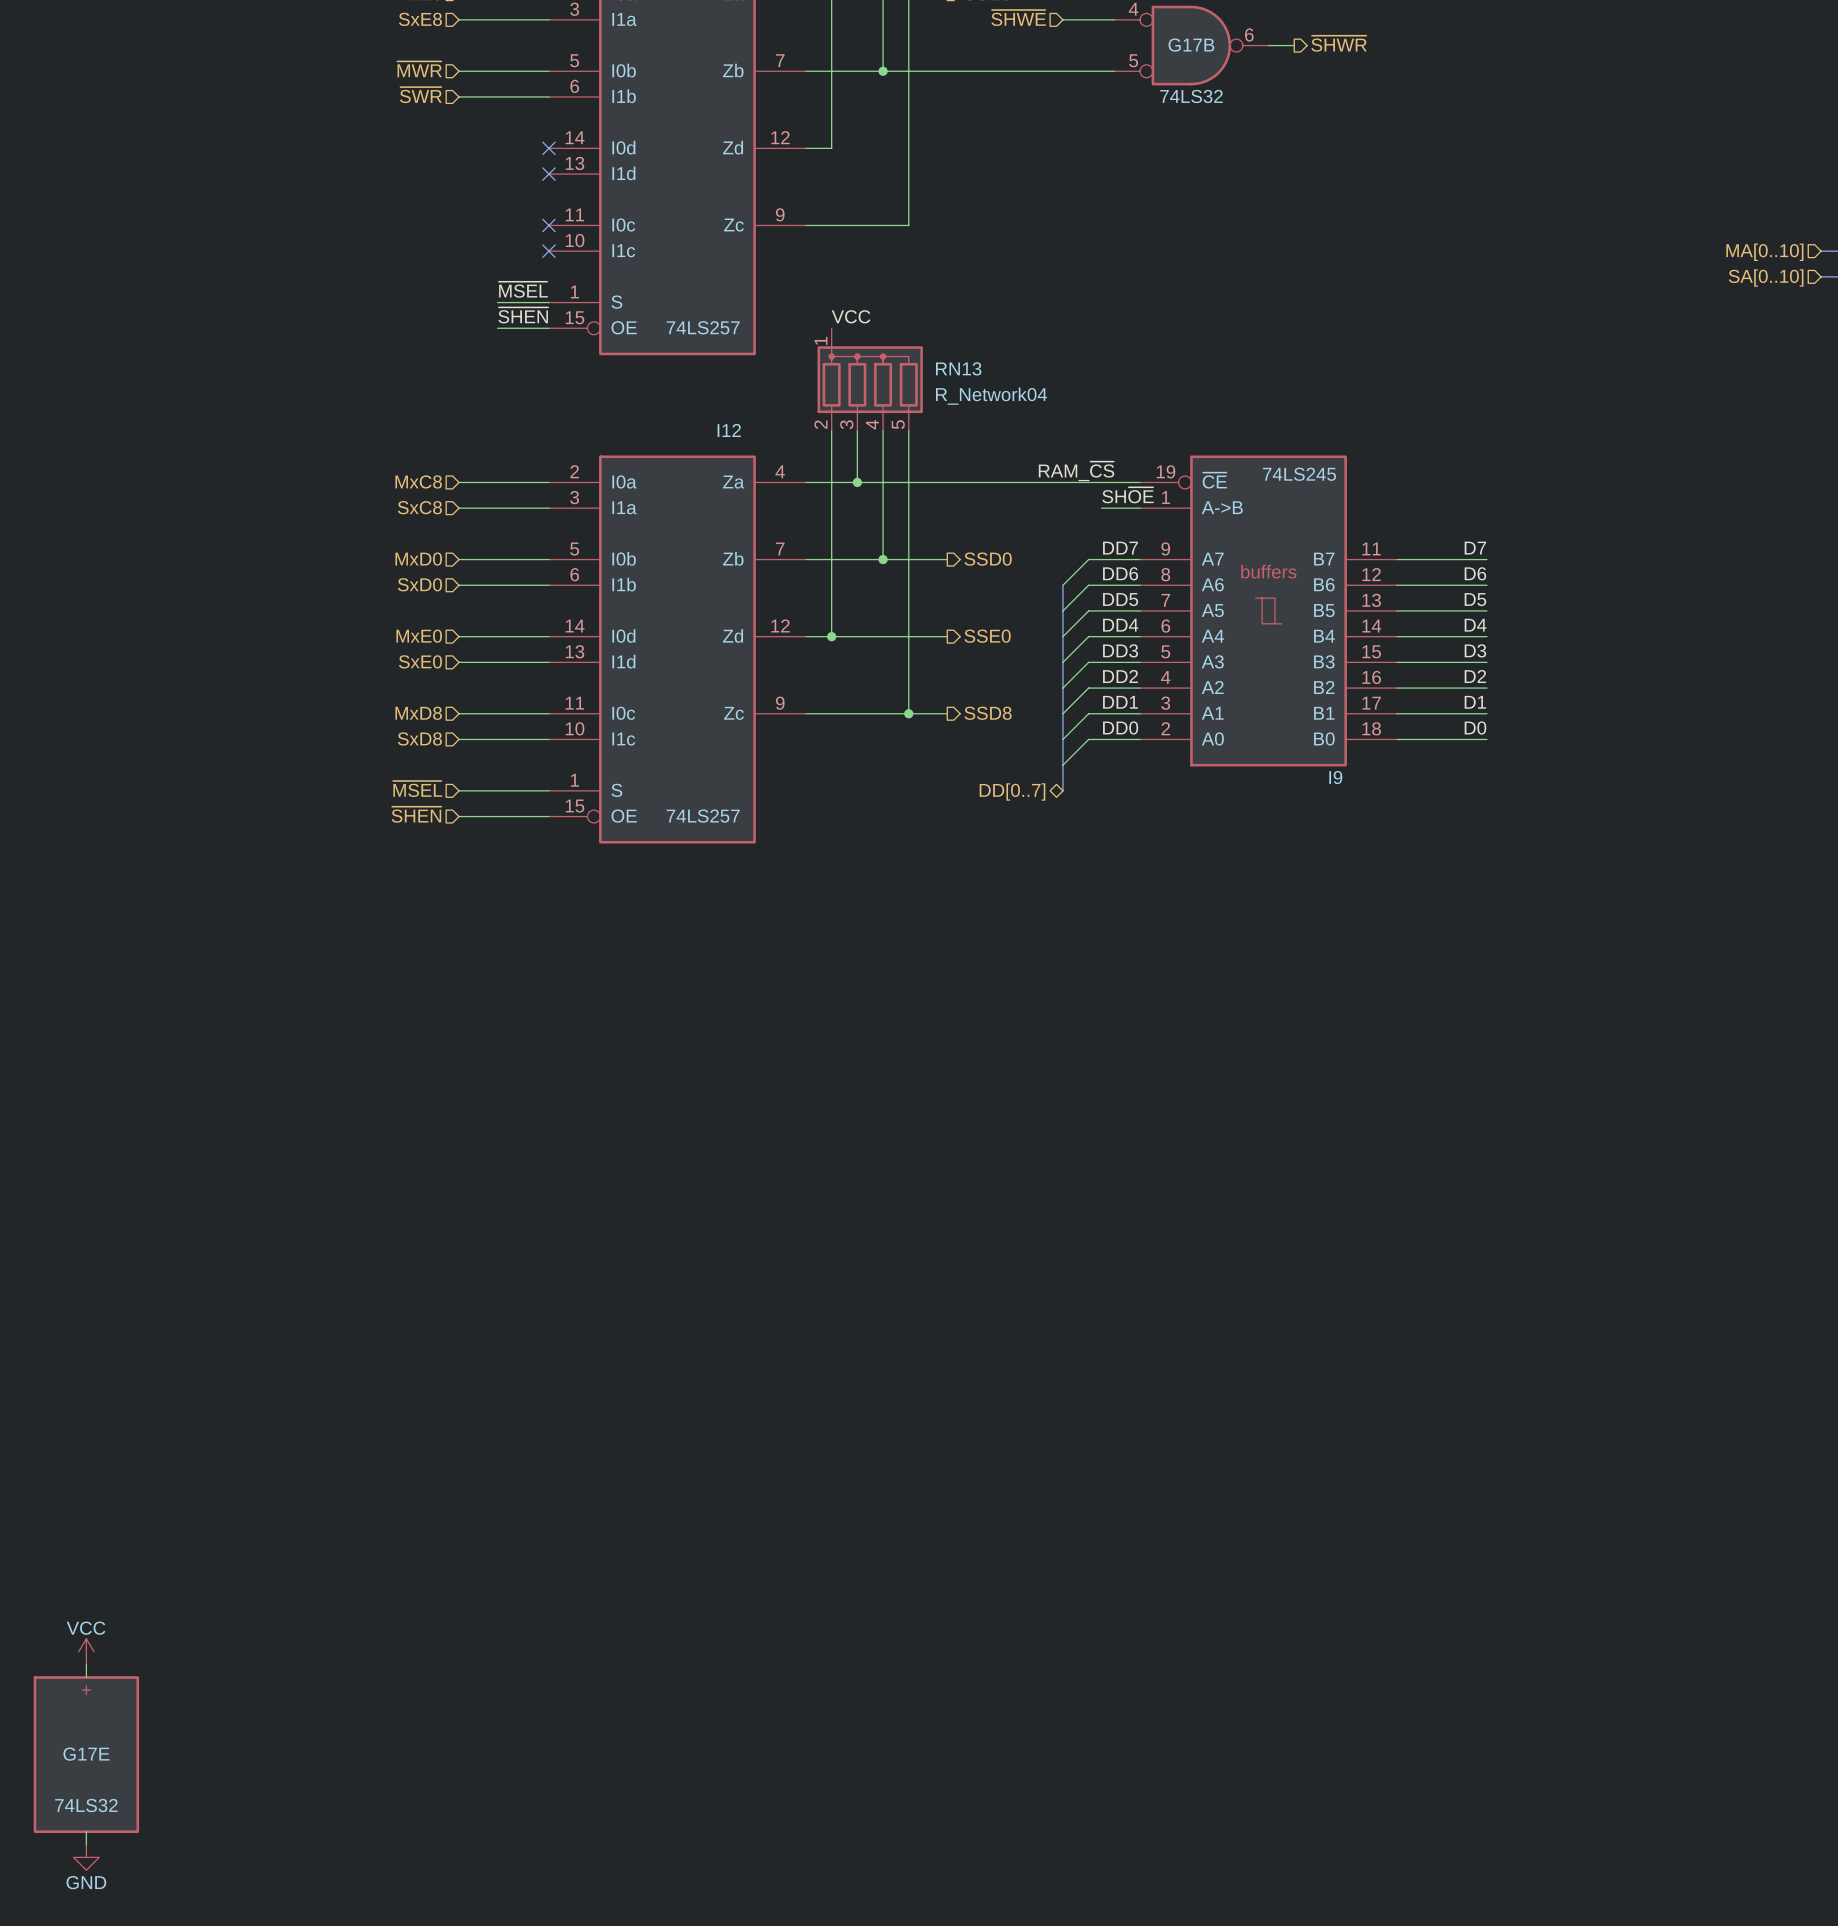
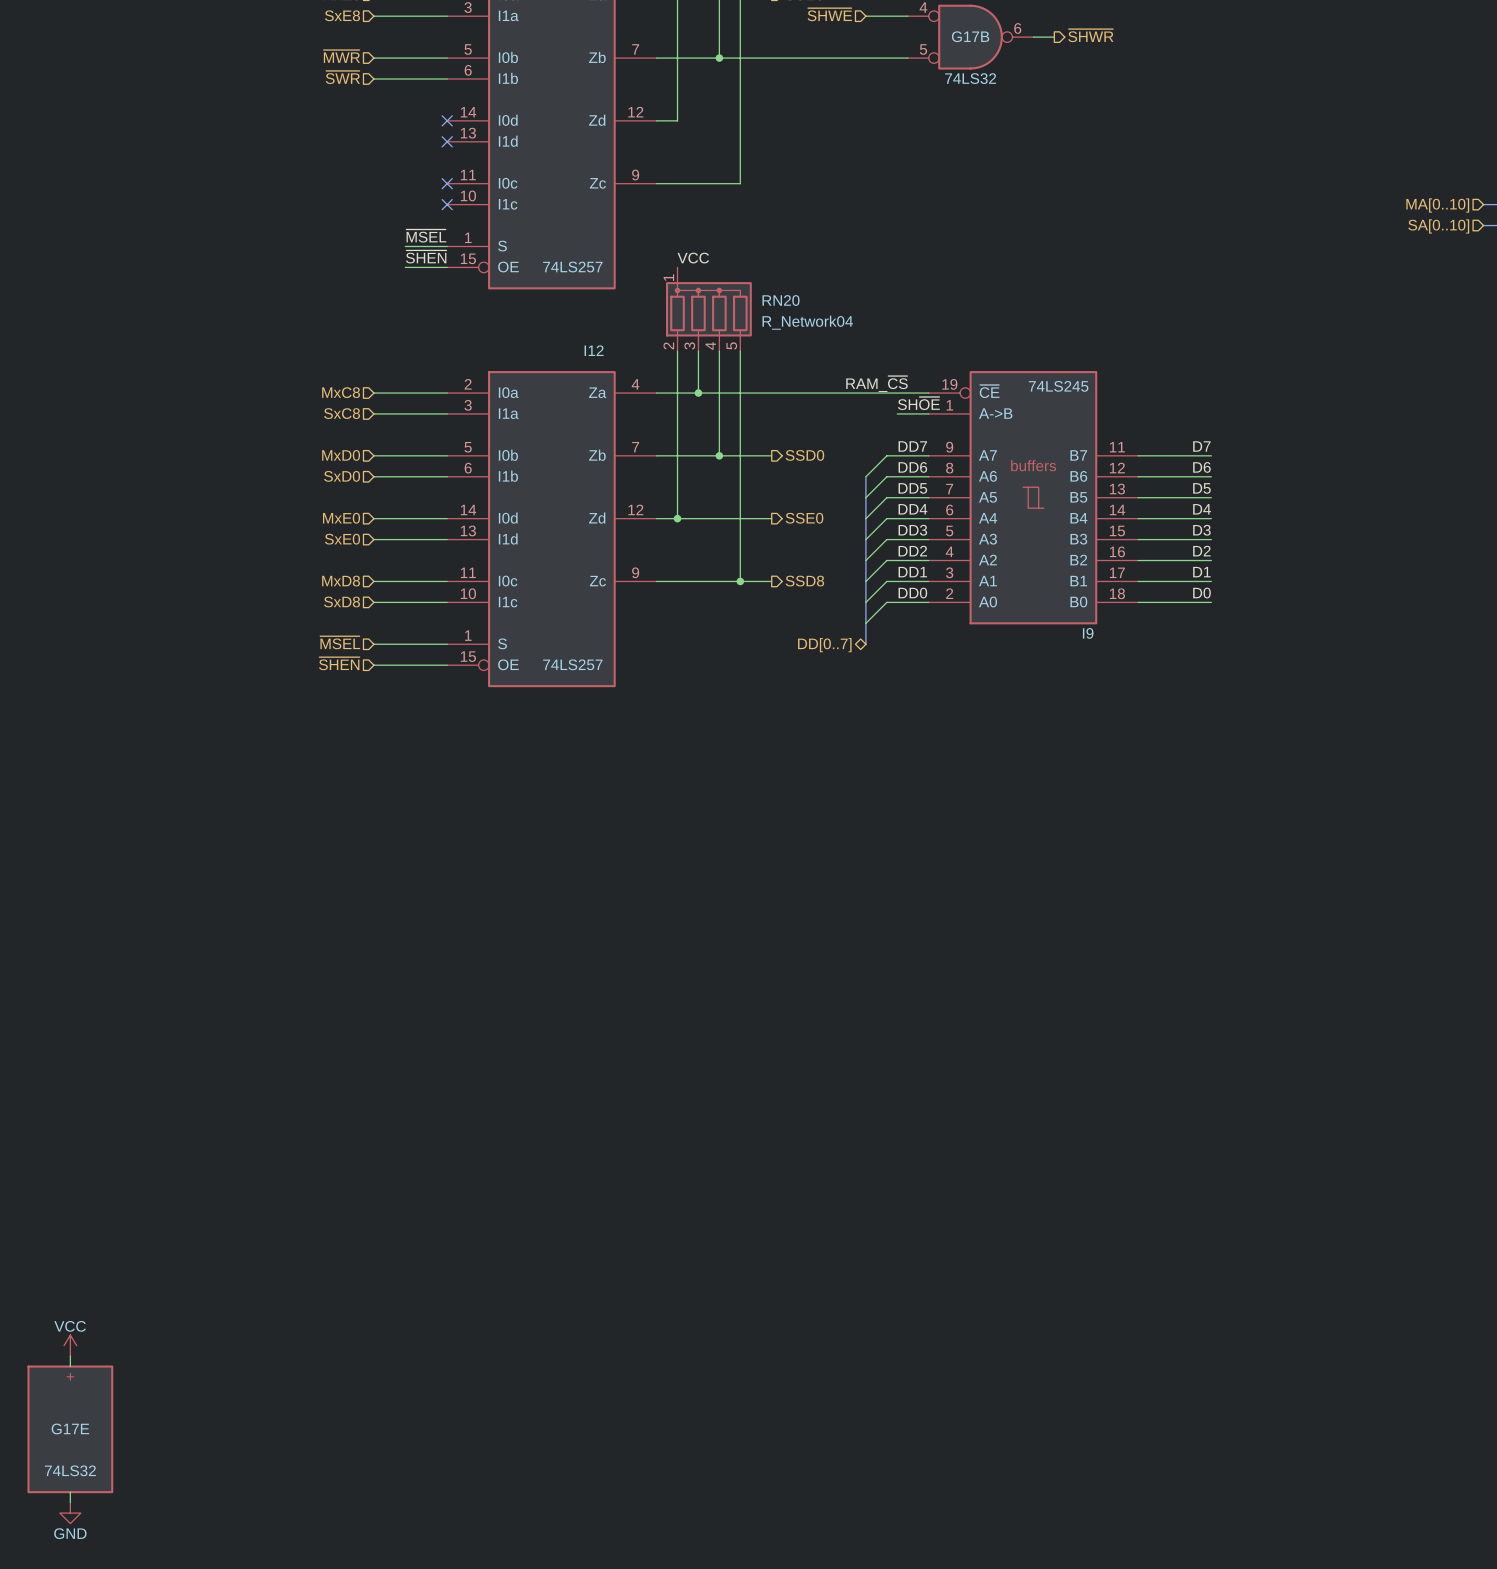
RN13 name: RN13 (958, 368) -> RN20 (781, 300)

